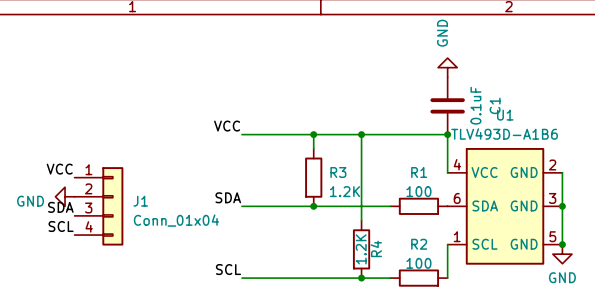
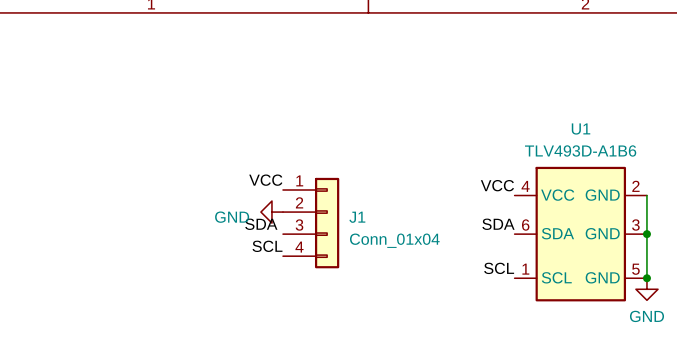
power symbol: GND (447, 67) -> none
C1: 0.1uF (447, 105) -> none
label position: VCC (227, 126) -> VCC (265, 180)
wire: (241, 134) (447, 134) (447, 172) -> none
wire: (313, 134) (313, 148) -> none
junction: (313, 134) -> none
wire: (361, 134) (361, 220) -> none
junction: (361, 134) -> none
junction: (447, 134) -> none
label: none -> VCC (497, 185)
label: VCC (59, 169) -> none
R3: 1.2K (313, 177) -> none
power symbol: none -> GND (271, 212)
power symbol: GND (65, 196) -> none
label: none -> SDA (498, 224)
J1 position: (98, 206) -> (311, 223)
wire: (241, 206) (390, 206) -> none
junction: (313, 206) -> none
R1: 100 (418, 206) -> none
label: SDA (60, 207) -> none
label: SCL (61, 226) -> none
label: none -> SCL (499, 268)
wire: (447, 244) (447, 278) -> none
R4: 1.2K (361, 249) -> none
label position: SCL (228, 269) -> SCL (267, 246)
wire: (241, 278) (390, 278) -> none
junction: (361, 278) -> none
R2: 100 (418, 278) -> none

